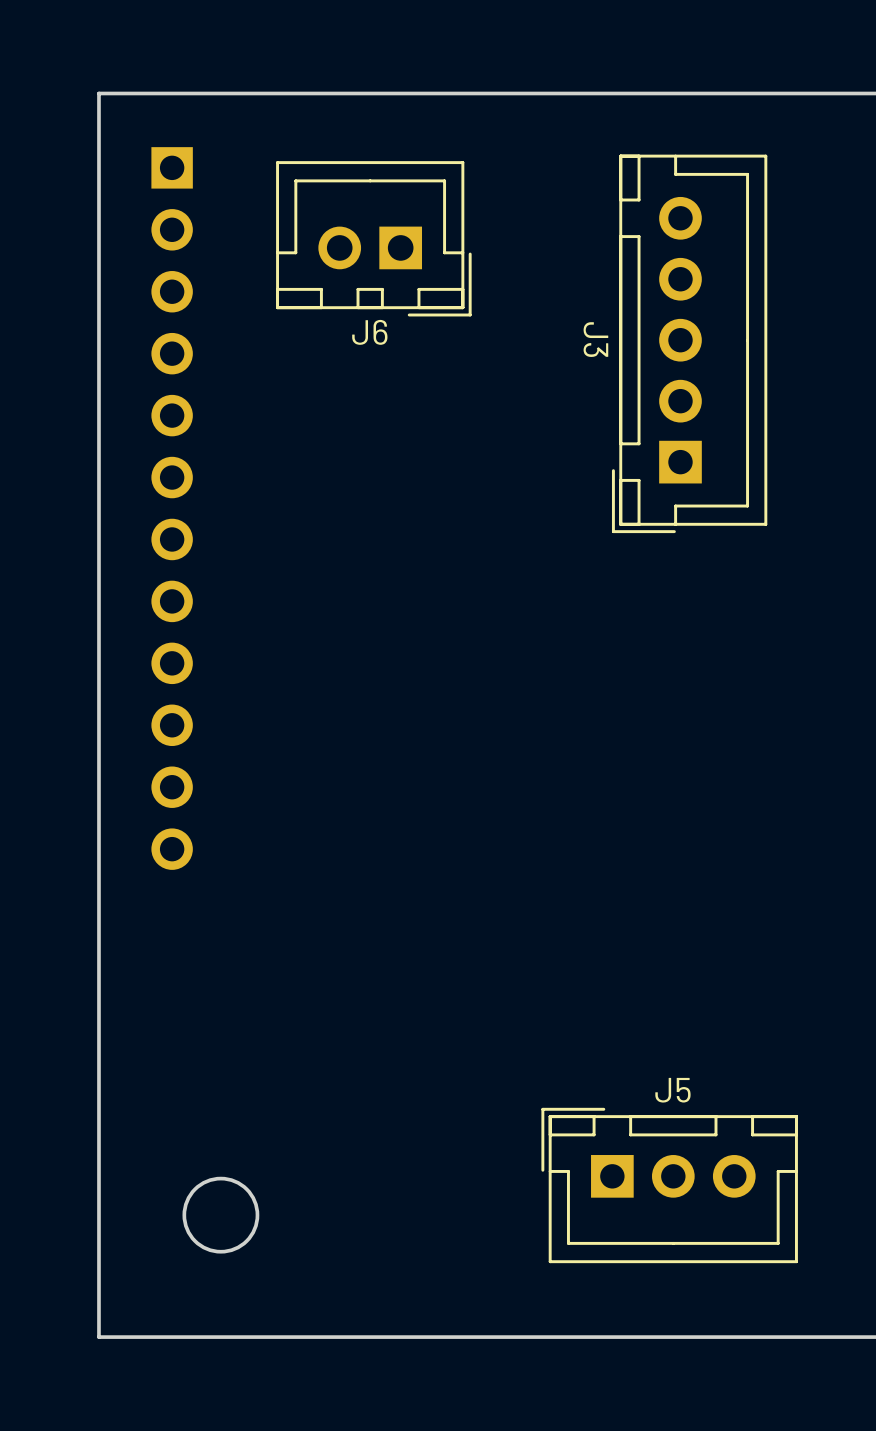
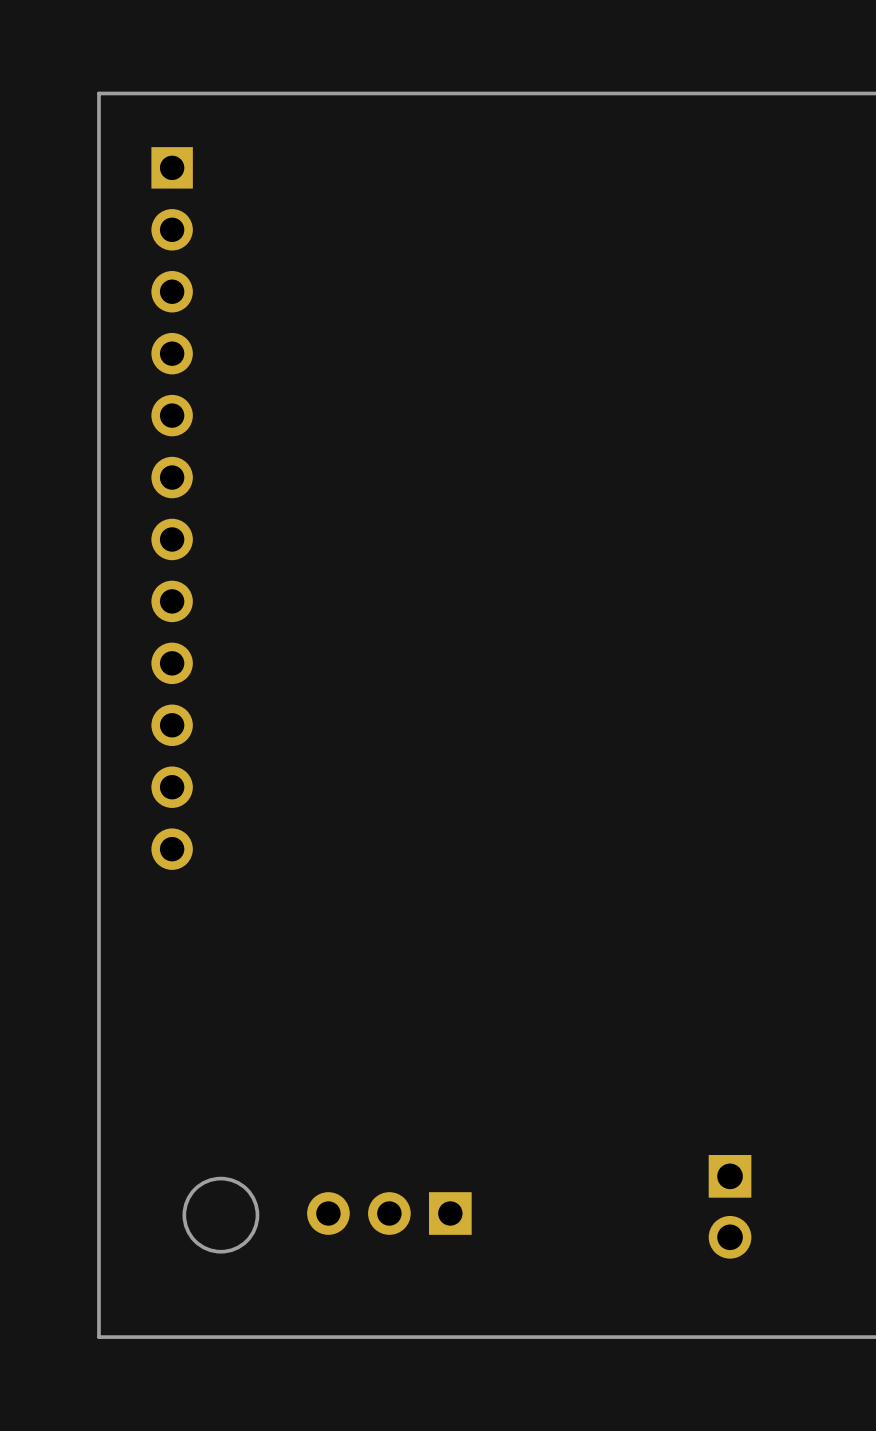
J6: (373, 238) -> none
J3: (689, 343) -> none
J5 side: bottom (669, 1185) -> top (389, 1213)
part: none -> (730, 1206)

